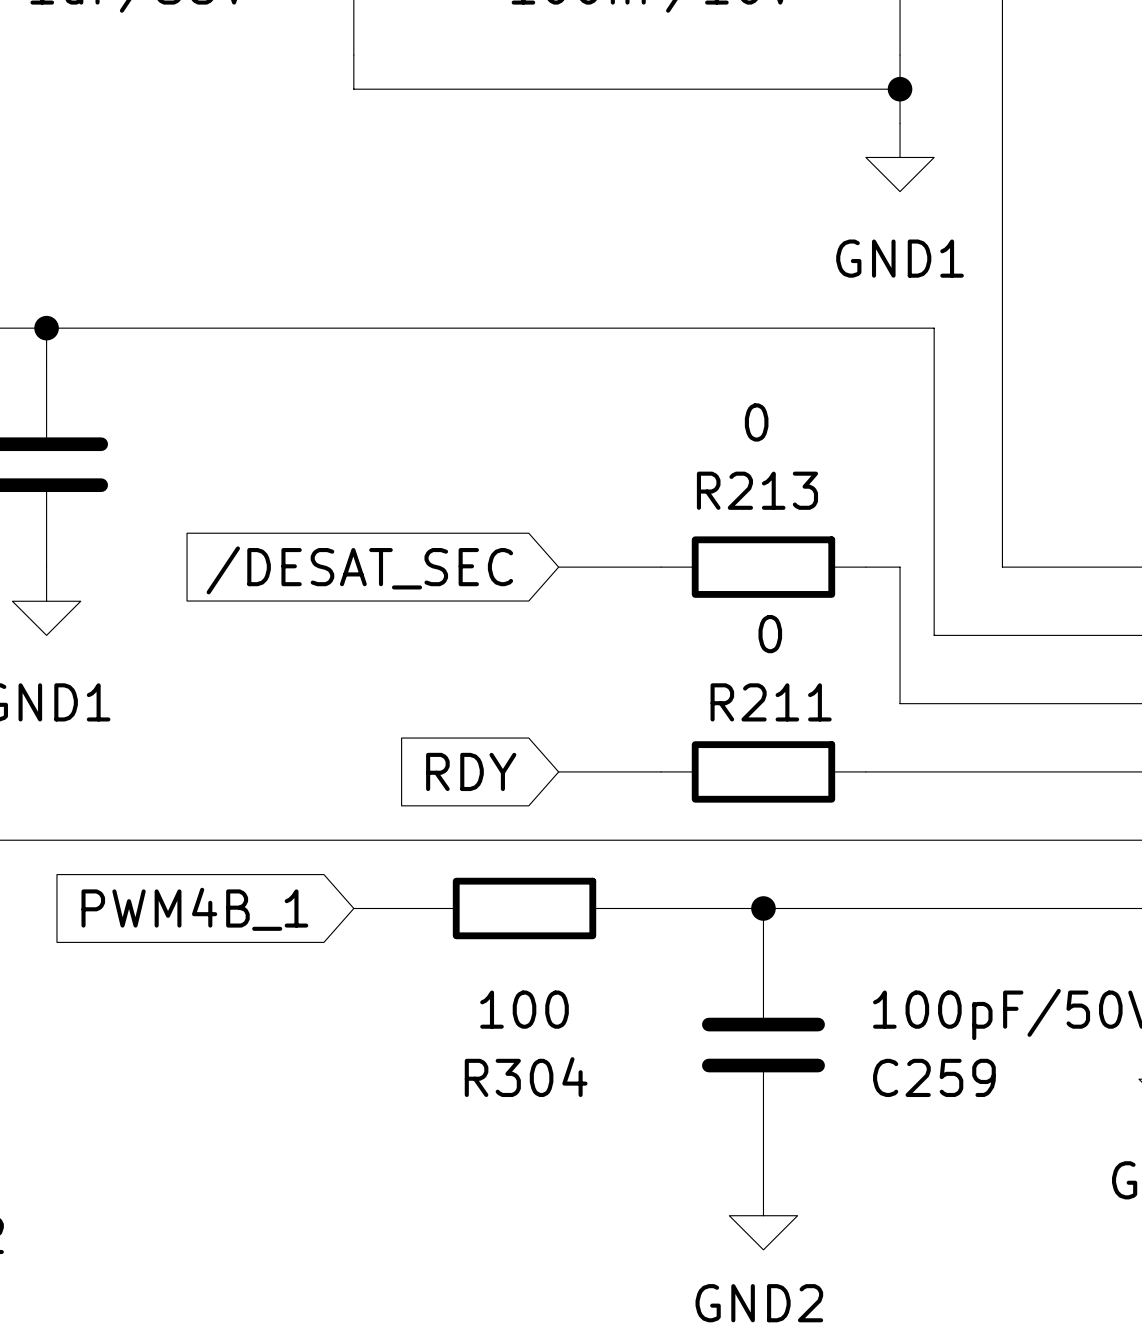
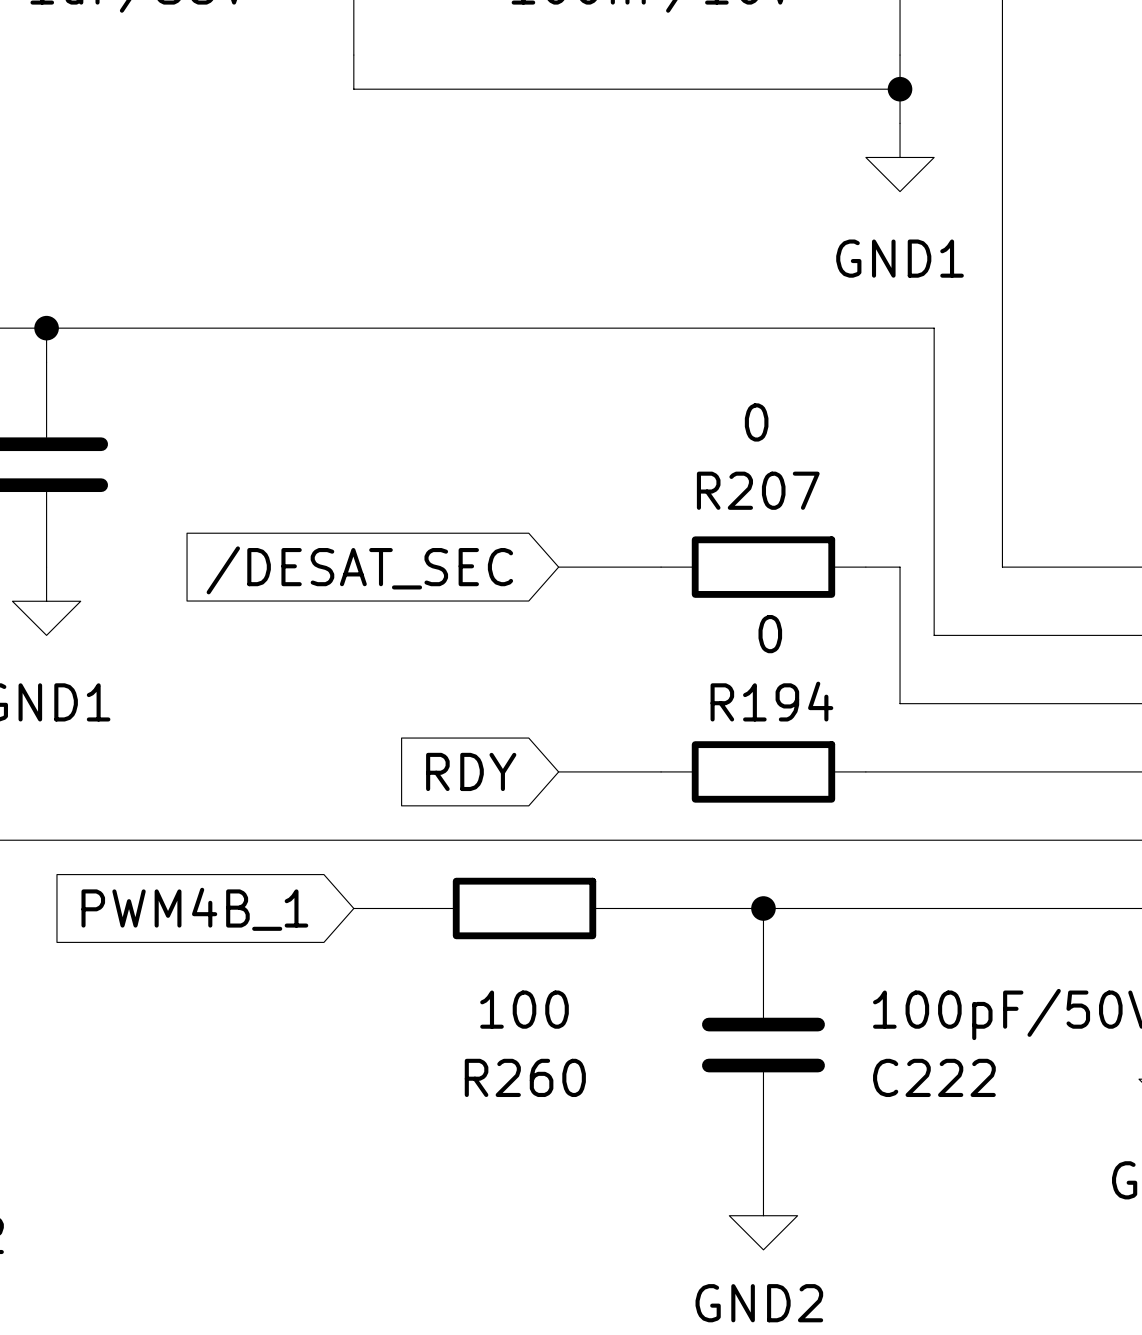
R213 name: R213 (757, 490) -> R207 (758, 490)
R211 name: R211 (771, 702) -> R194 (771, 701)
R304 name: R304 (526, 1077) -> R260 (525, 1077)
C259 name: C259 (934, 1077) -> C222 (934, 1077)

